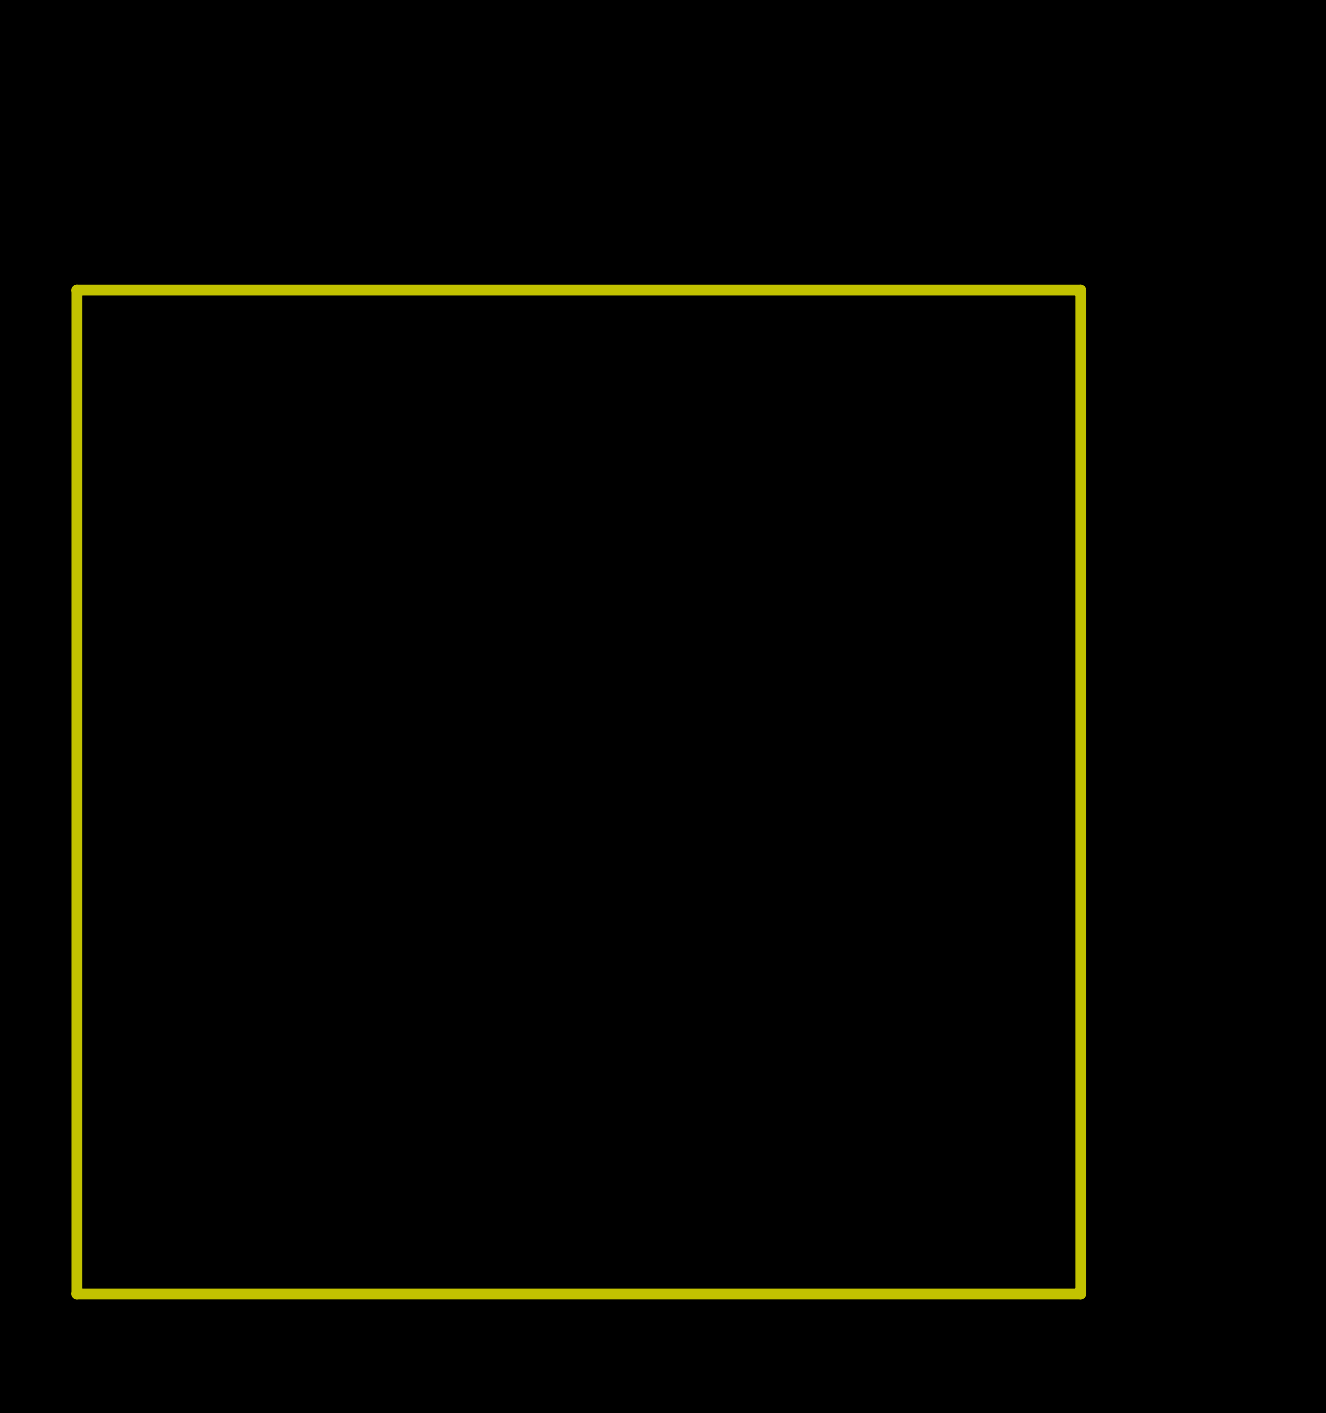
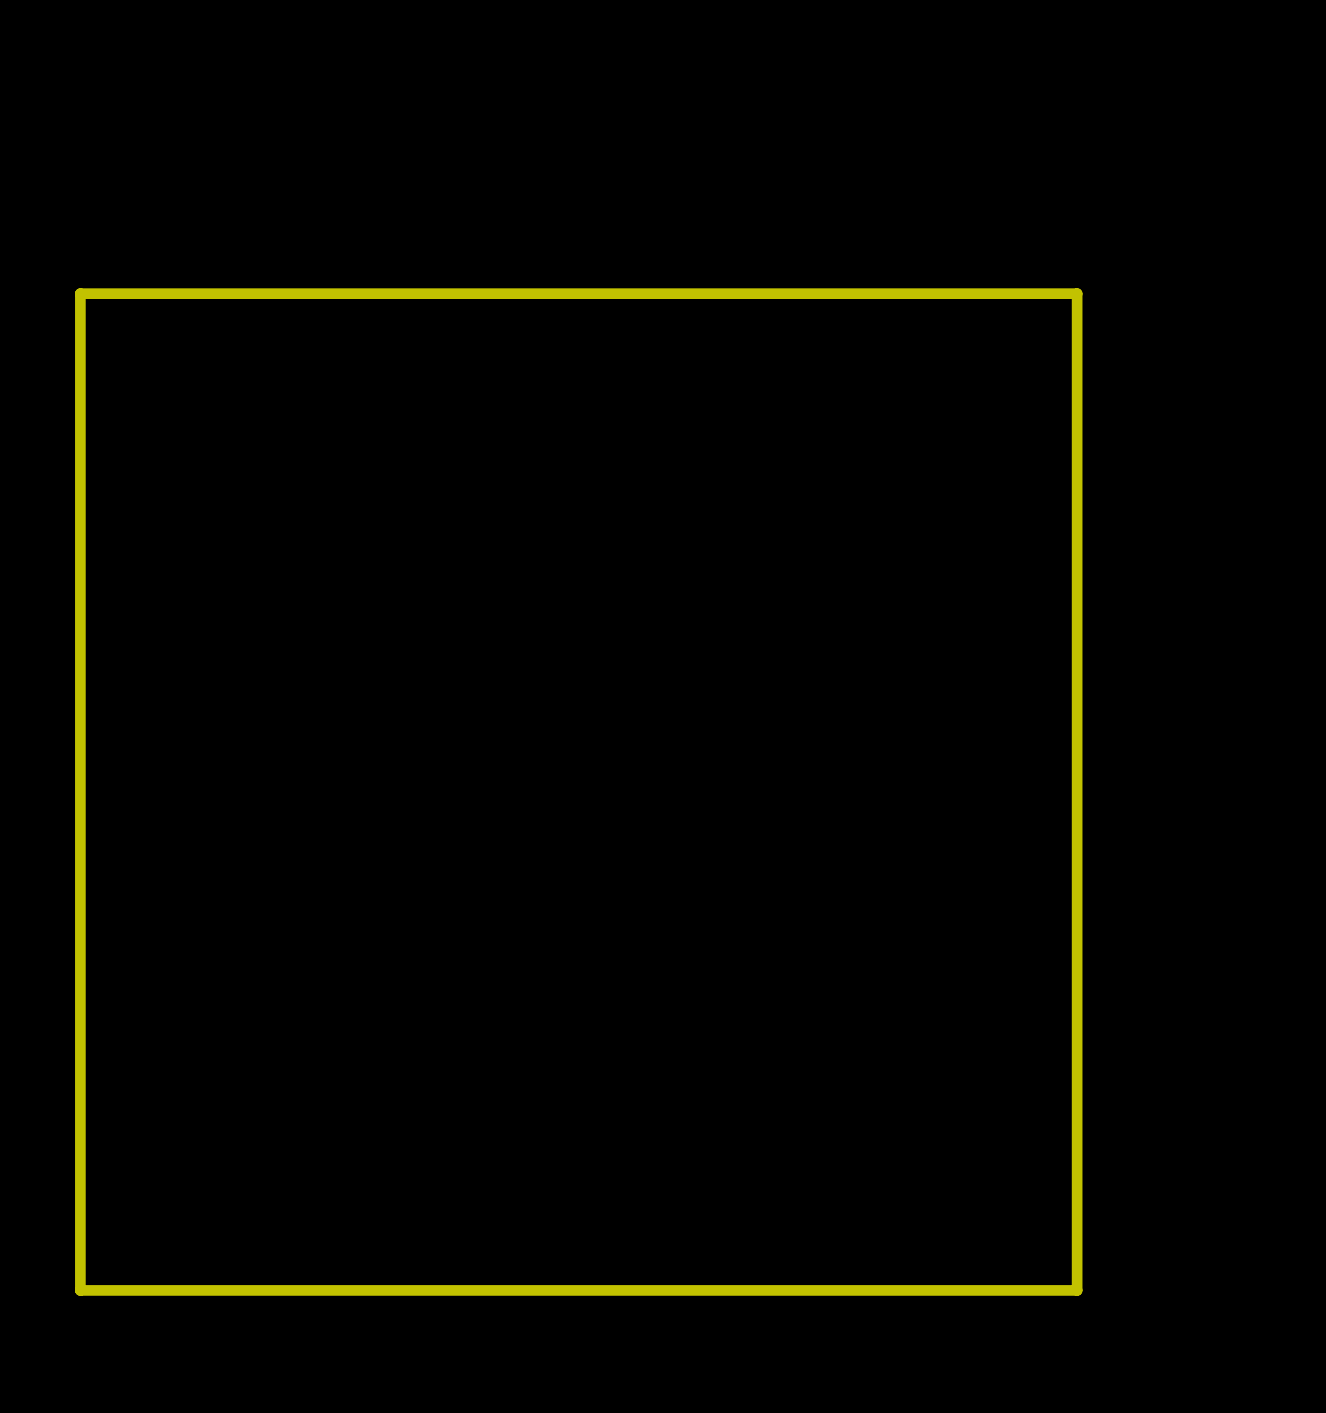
drawing shape: [71, 284, 1087, 1300] -> [75, 288, 1083, 1296]

